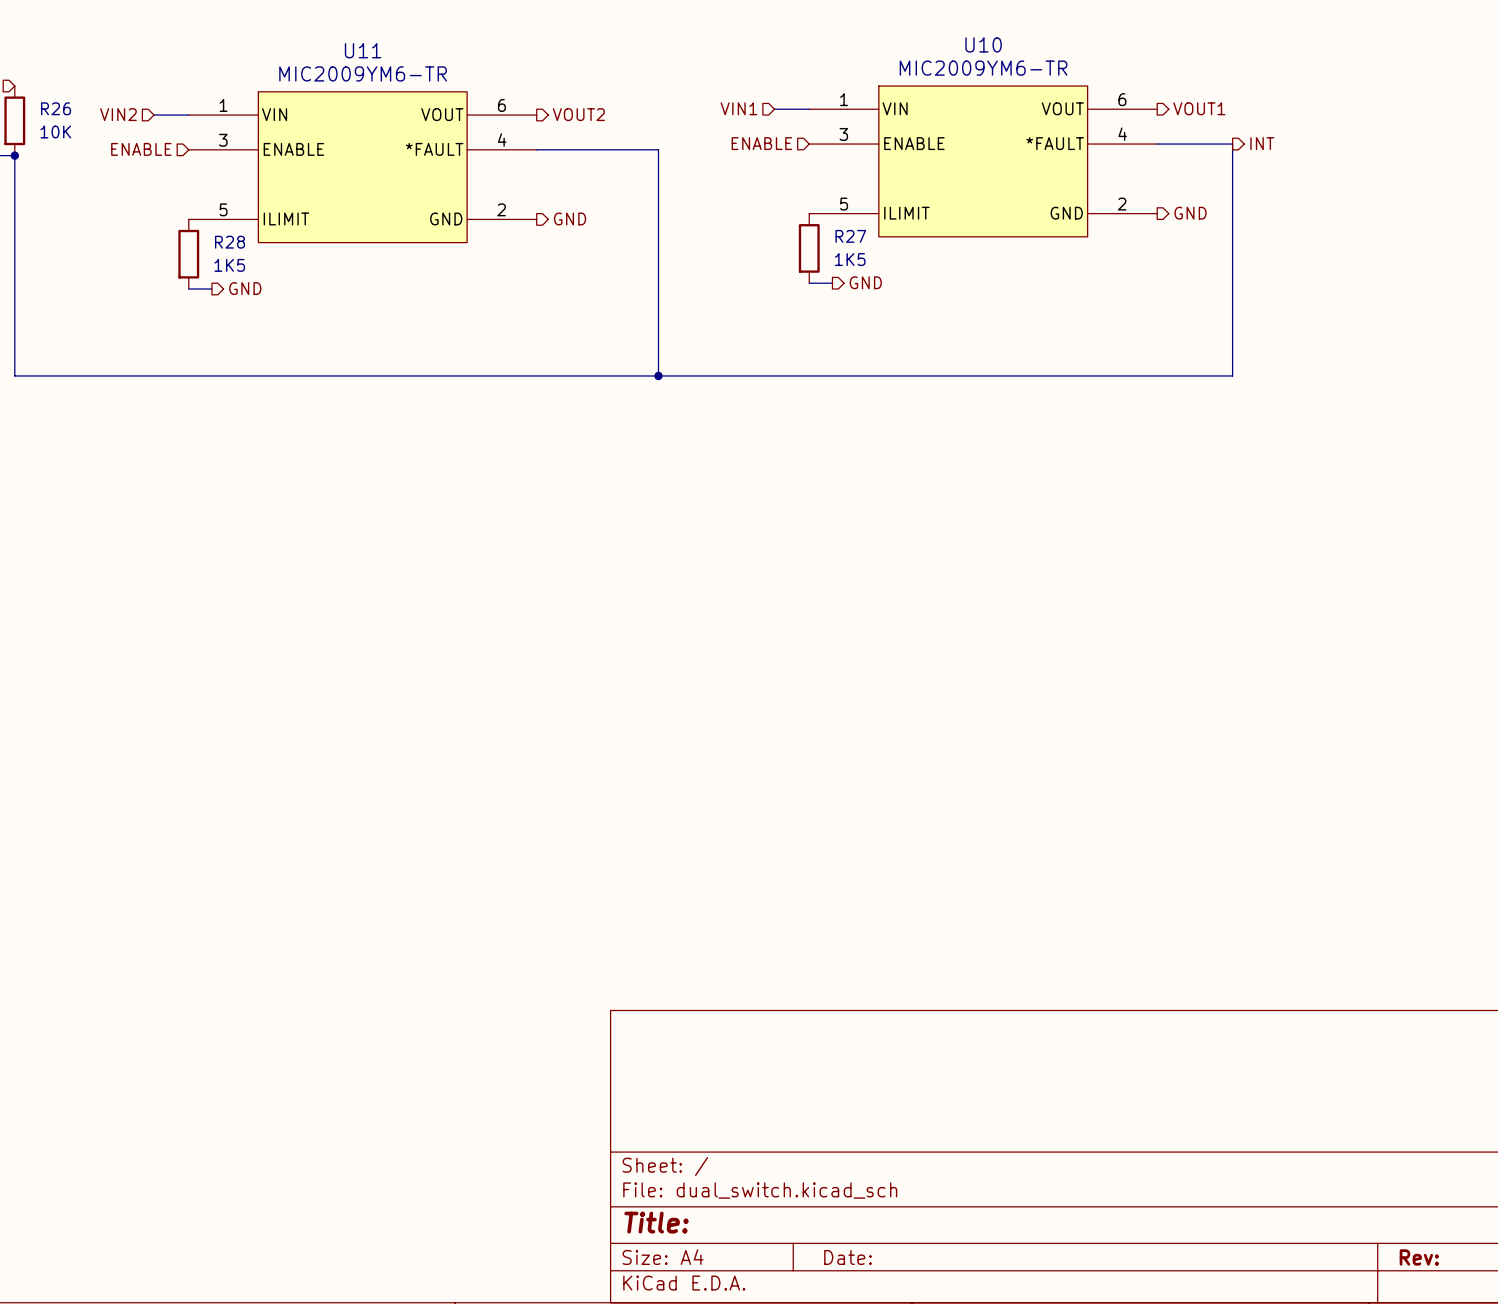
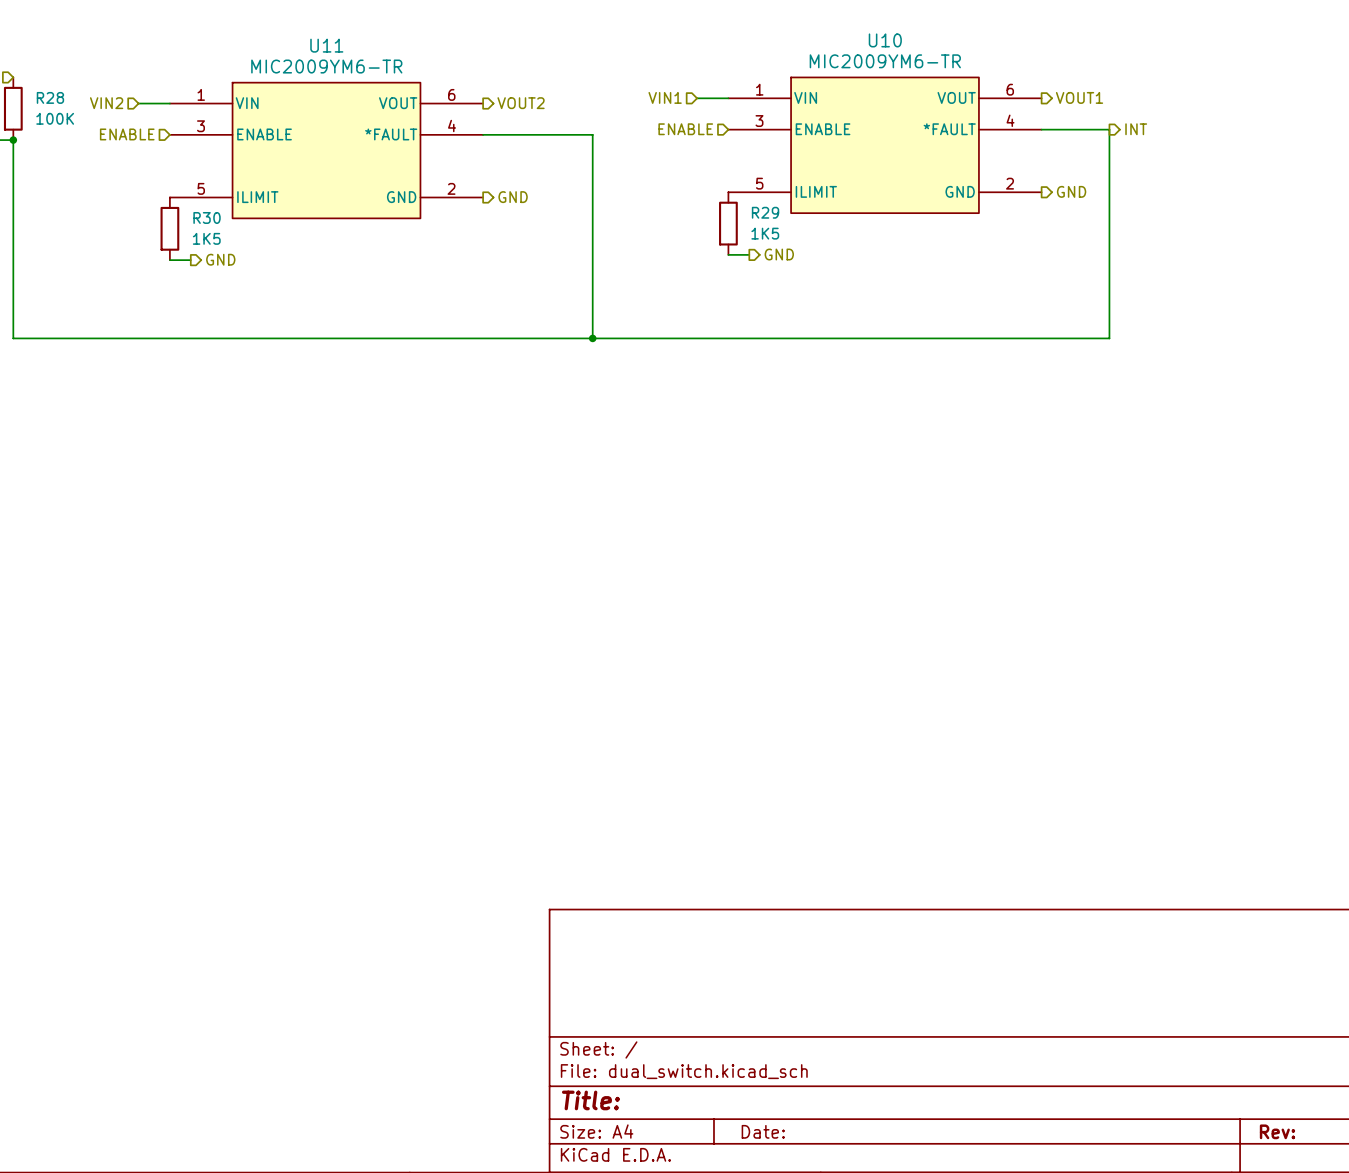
R26 name: R26 (56, 108) -> R28 (50, 97)
R26 value: 10K (55, 131) -> 100K (55, 118)
R27 name: R27 (850, 236) -> R29 (765, 212)
R28 name: R28 (230, 242) -> R30 (207, 217)

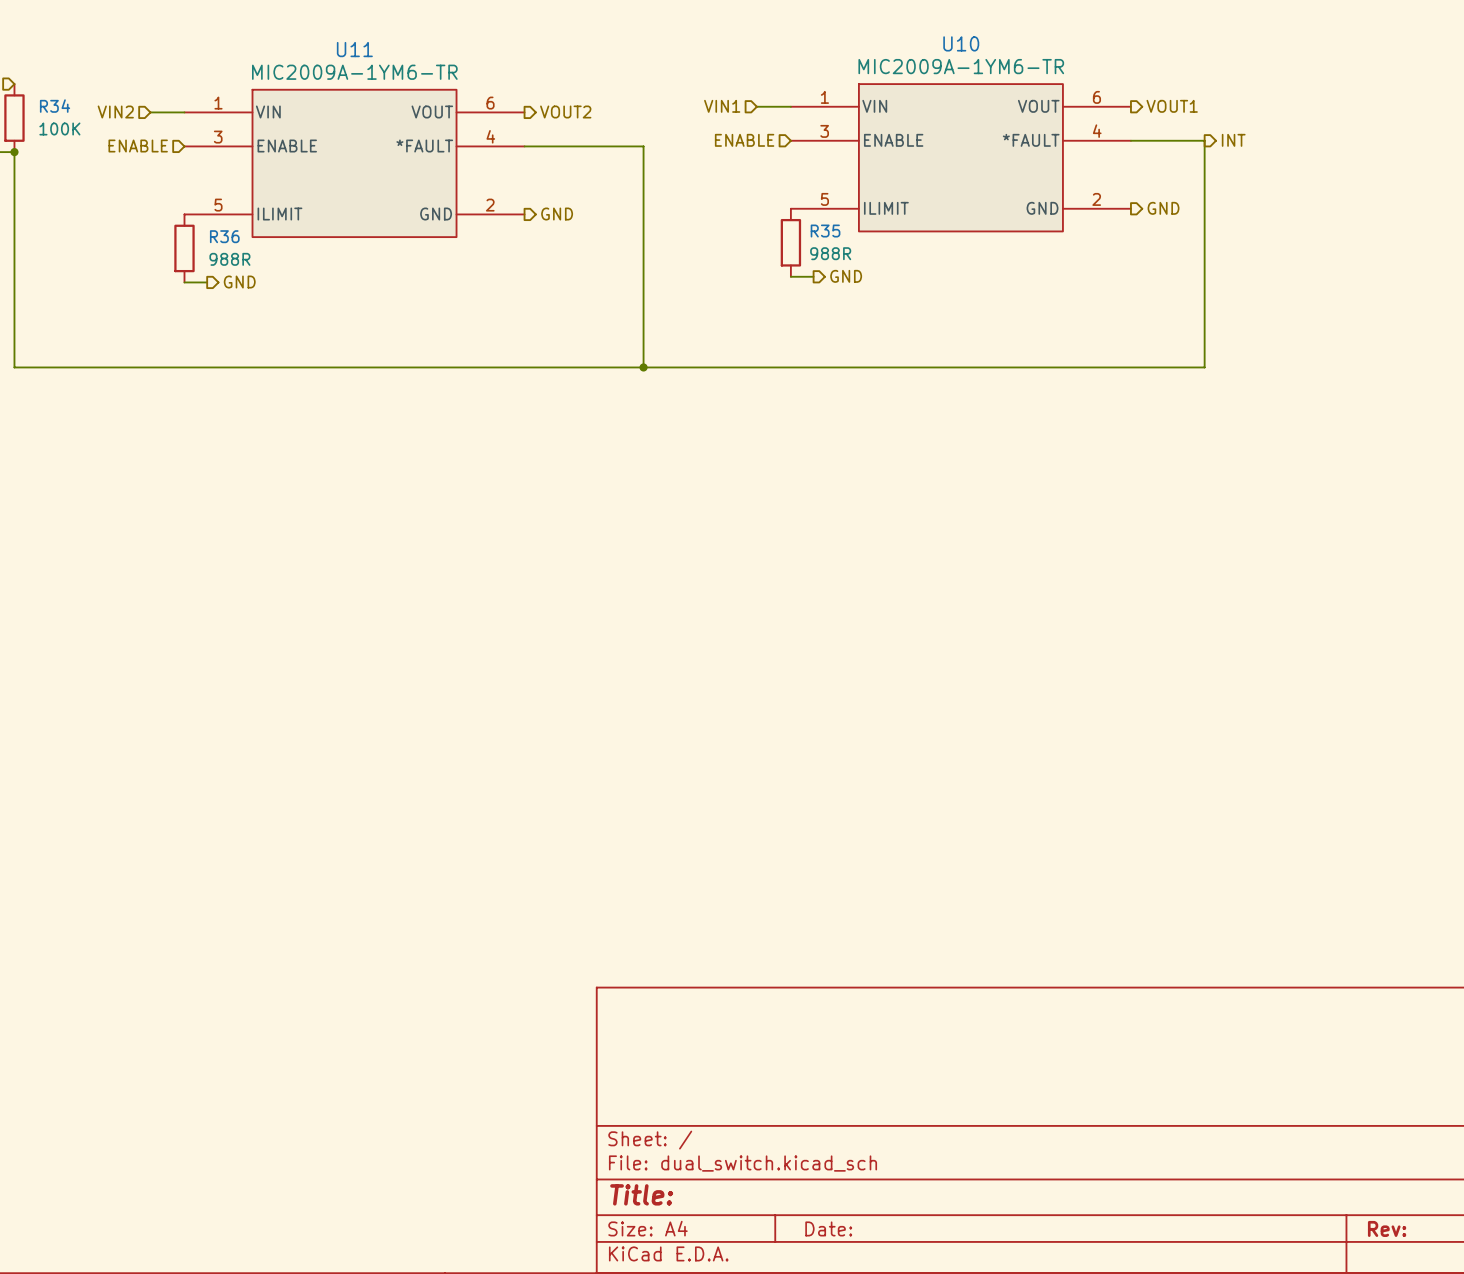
U10 value: MIC2009YM6-TR (885, 61) -> MIC2009A-1YM6-TR (961, 66)
U11 value: MIC2009YM6-TR (326, 66) -> MIC2009A-1YM6-TR (354, 72)
R28 name: R28 (50, 97) -> R34 (55, 106)
R29 name: R29 (765, 212) -> R35 (825, 231)
R30 name: R30 (207, 217) -> R36 (224, 236)
R29 value: 1K5 (765, 233) -> 988R (830, 253)
R30 value: 1K5 (206, 238) -> 988R (229, 259)

